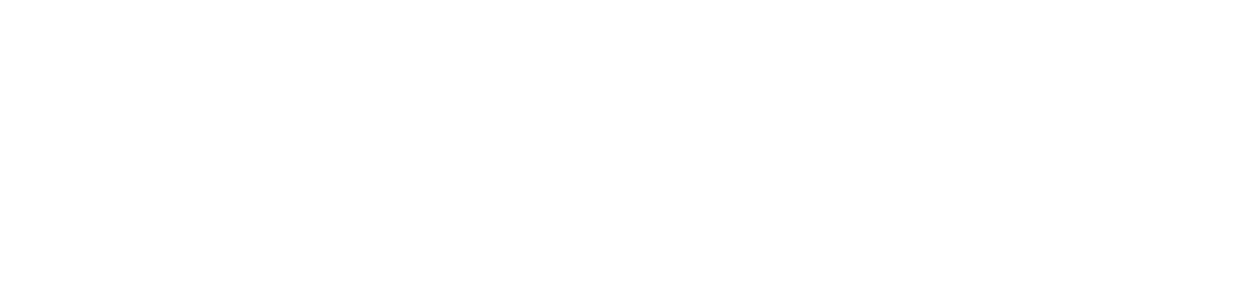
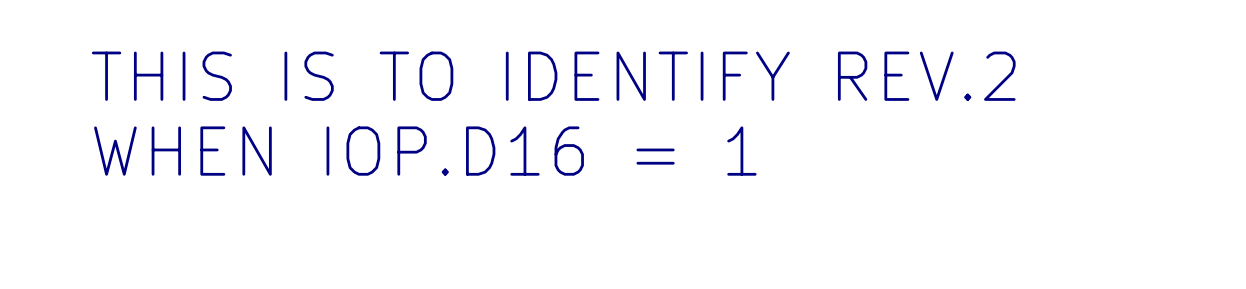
text: none -> THIS IS TO IDENTIFY REV.2 (553, 76)
text: none -> WHEN IOP.D16 = 1 (425, 151)

